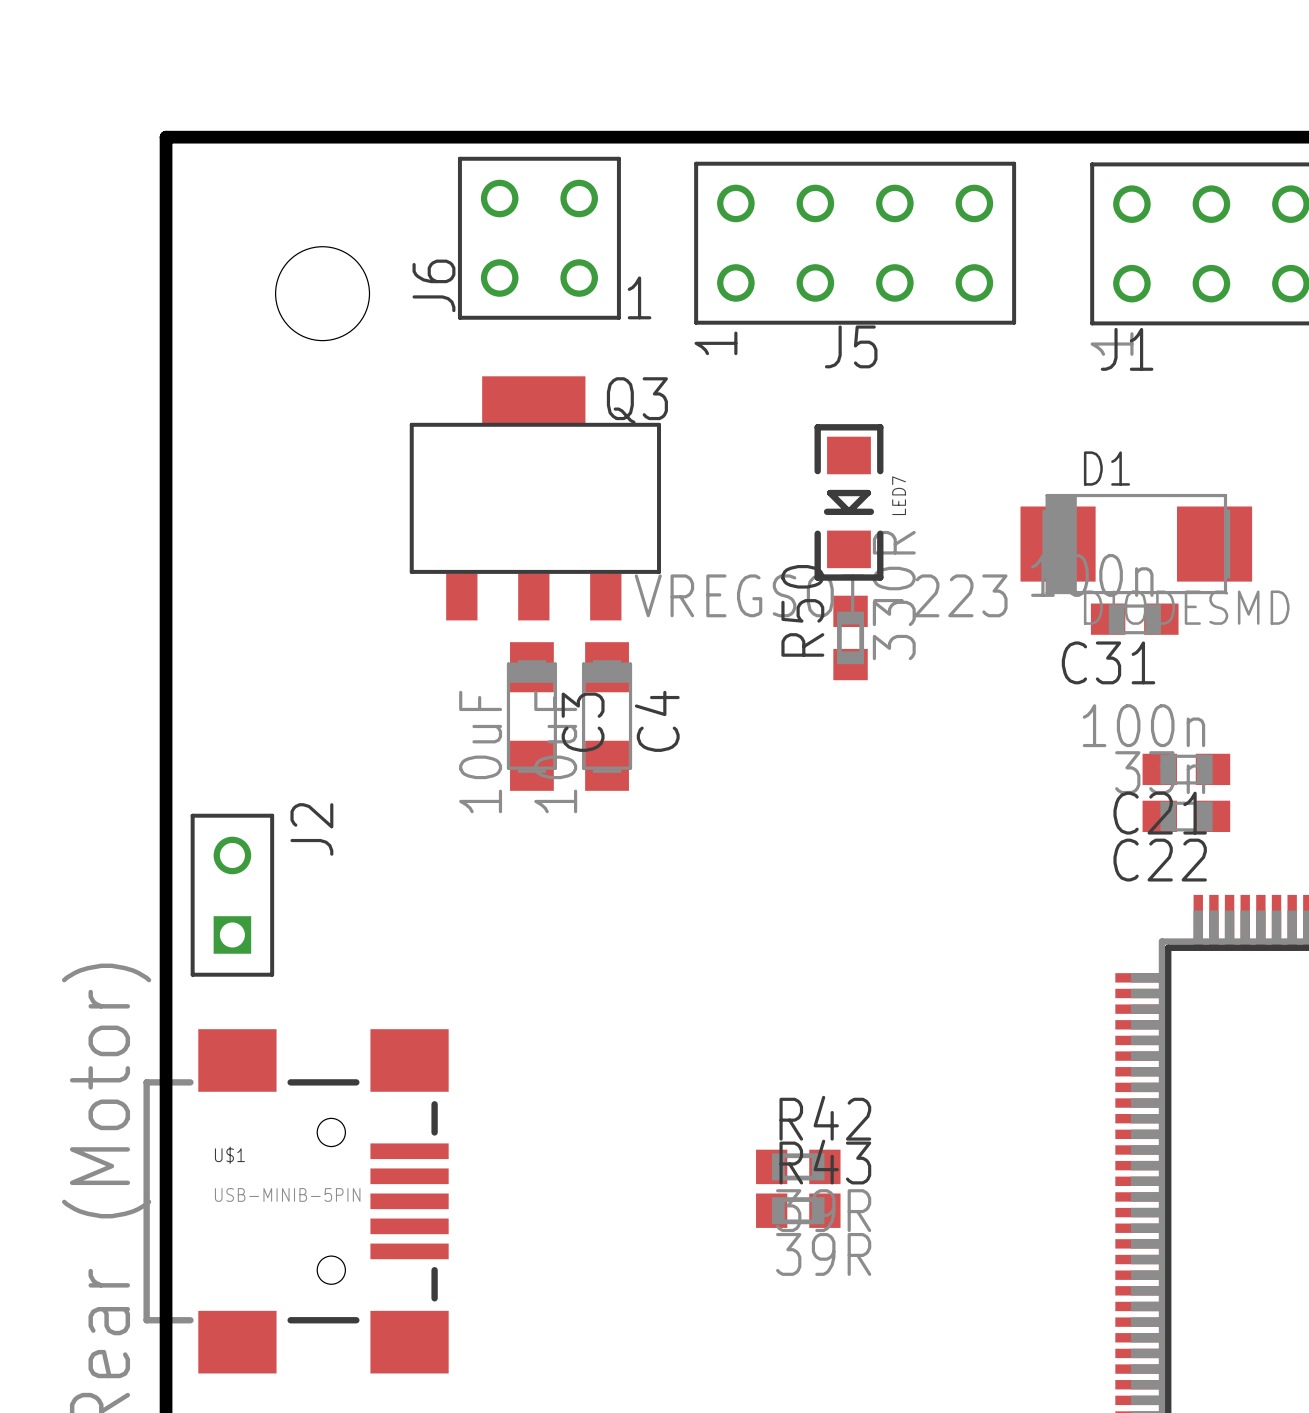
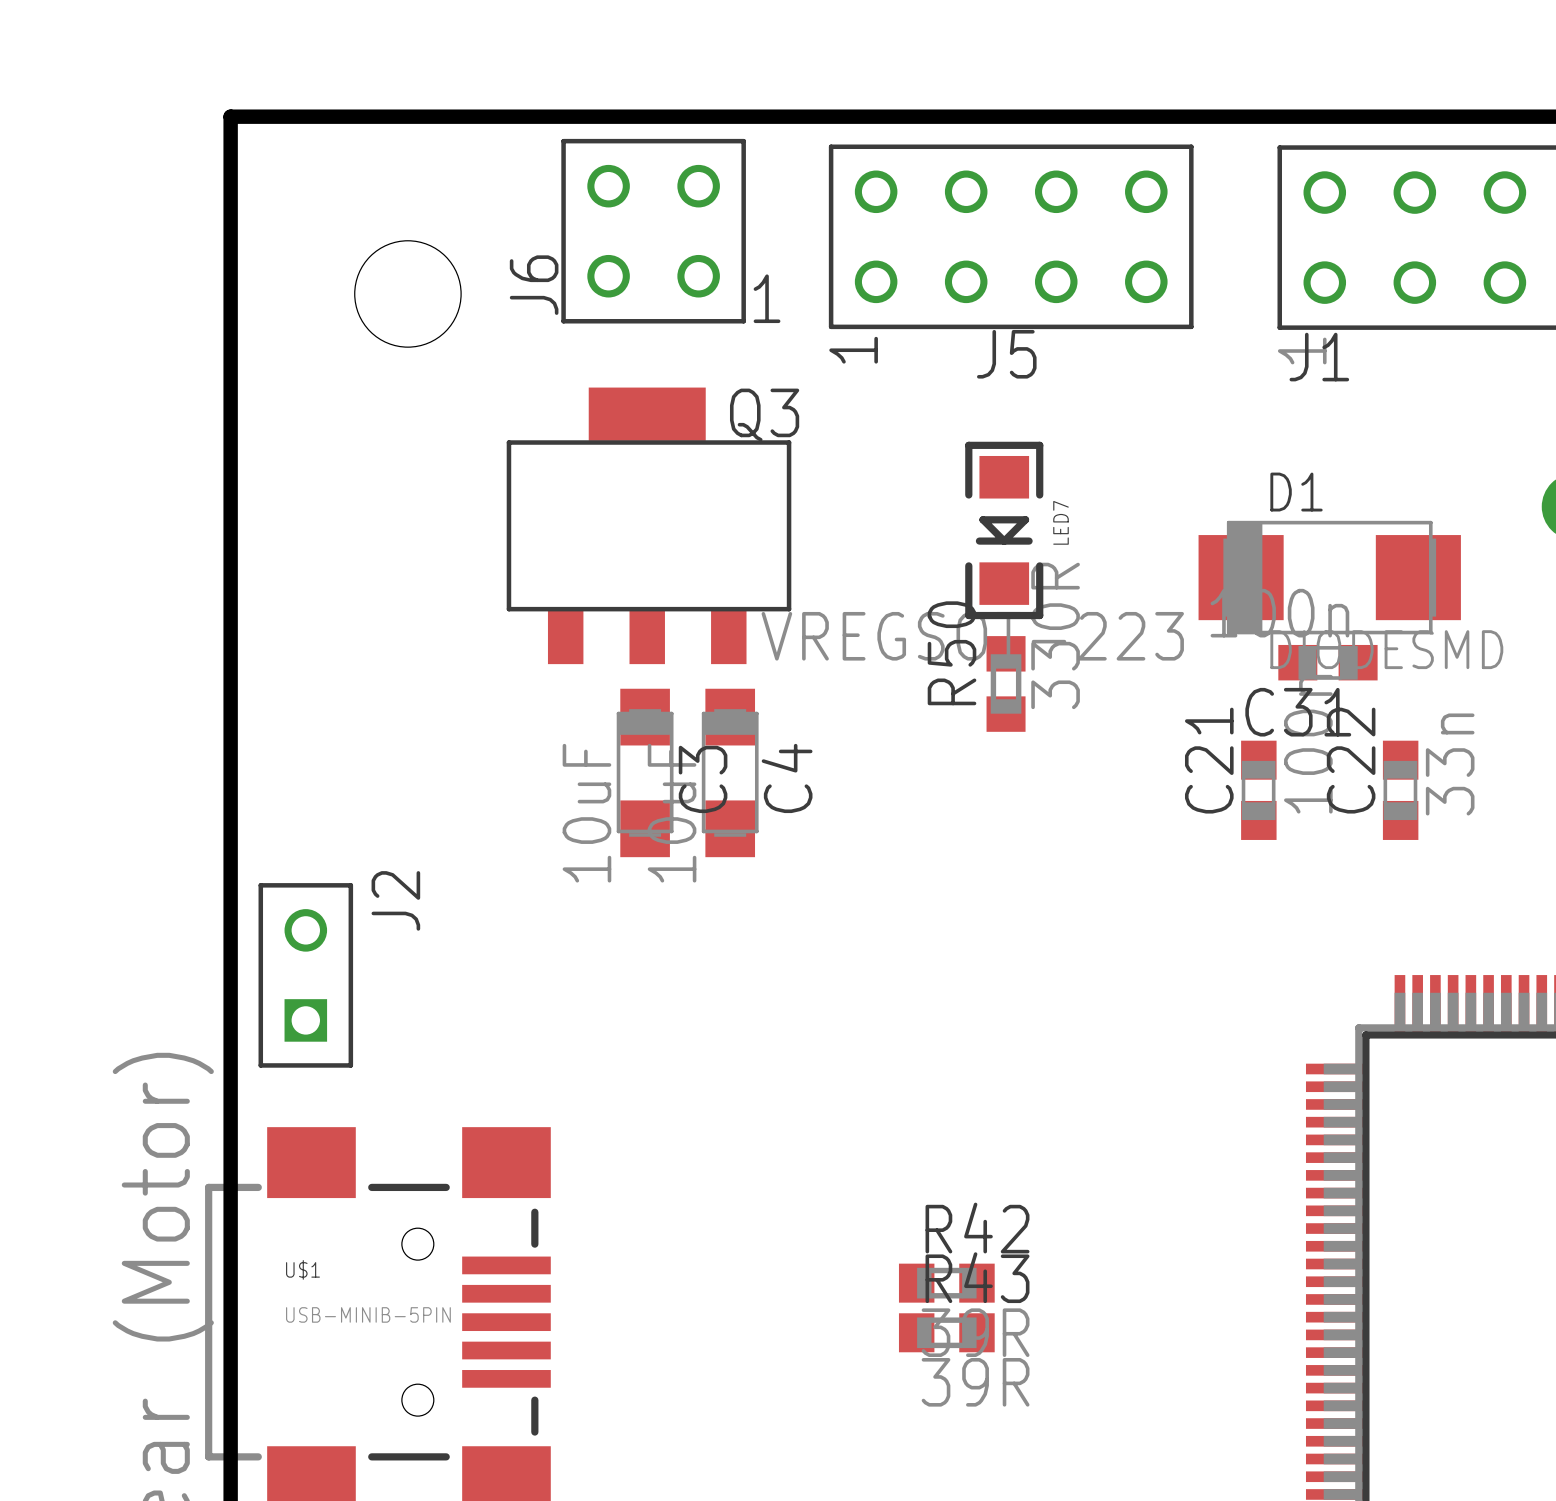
C21 rotation: 0° (1186, 769) -> 90° clockwise (1258, 790)
C21 position: (1186, 769) -> (1258, 790)
C22 rotation: 0° (1186, 816) -> 90° clockwise (1400, 790)
C22 position: (1186, 816) -> (1400, 790)

